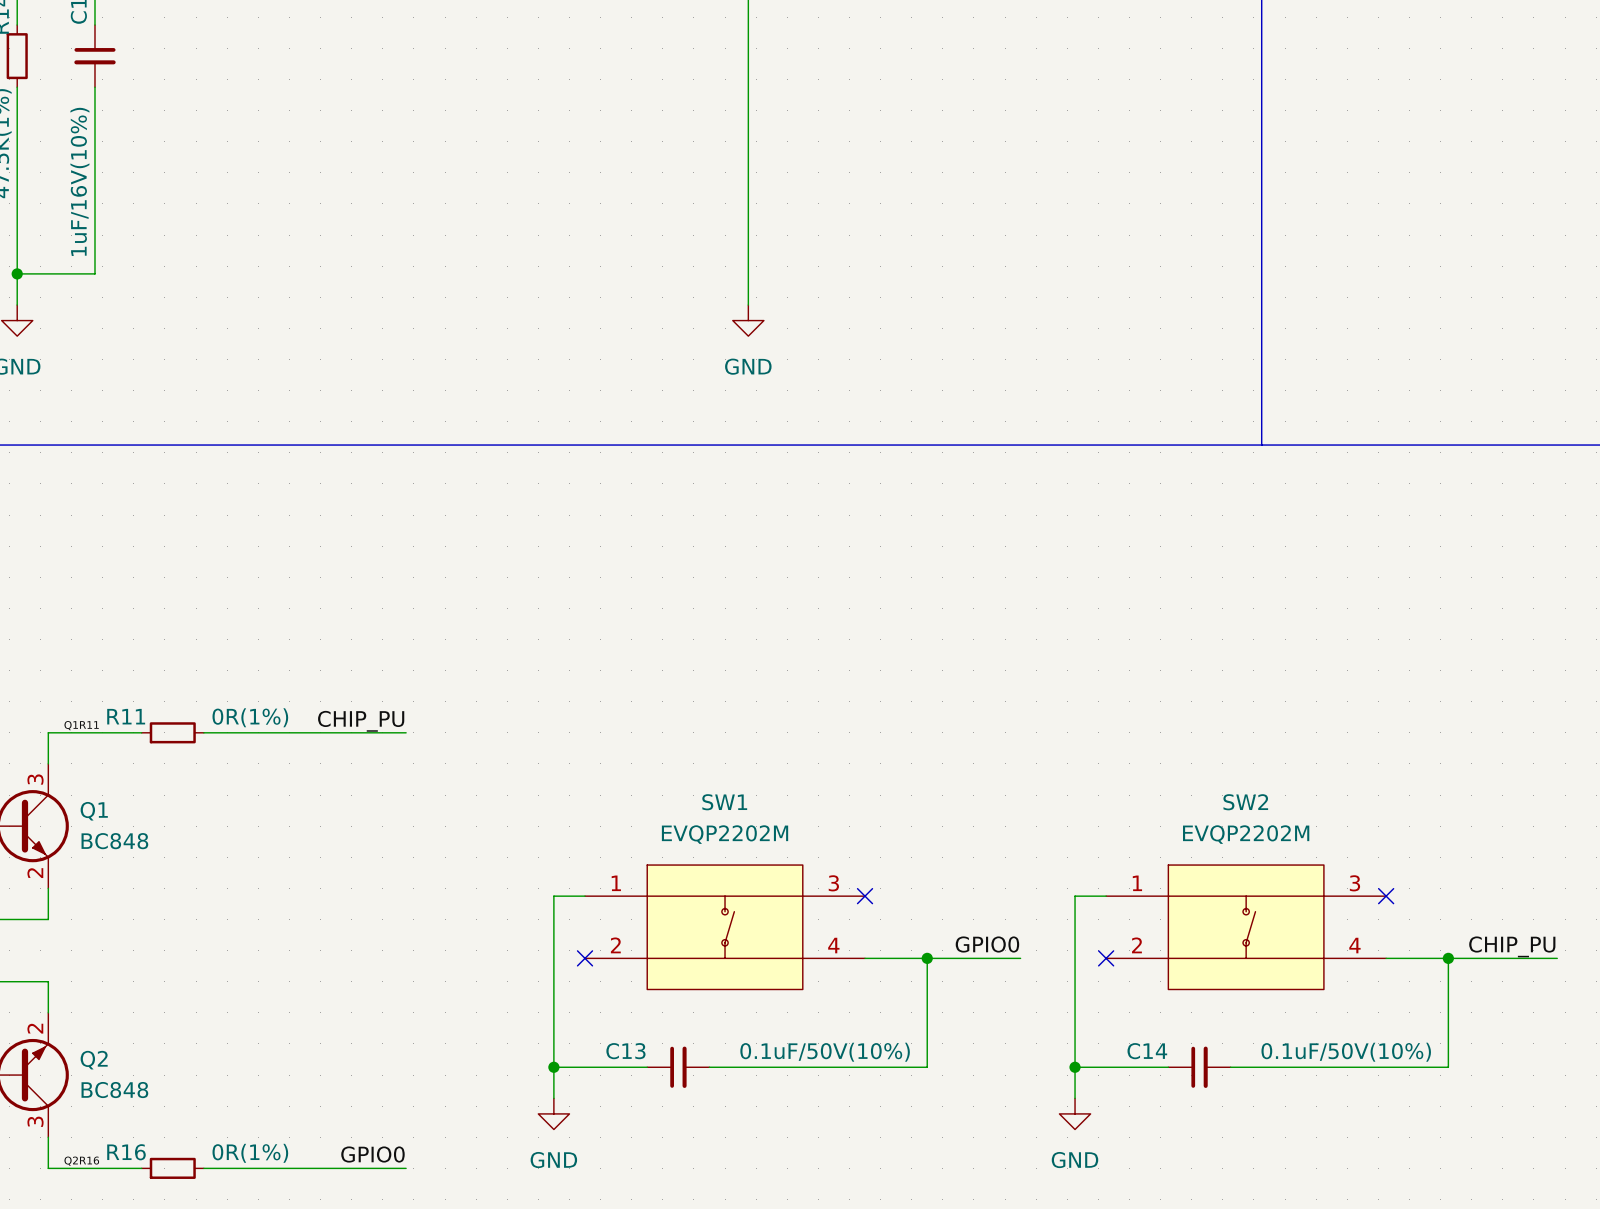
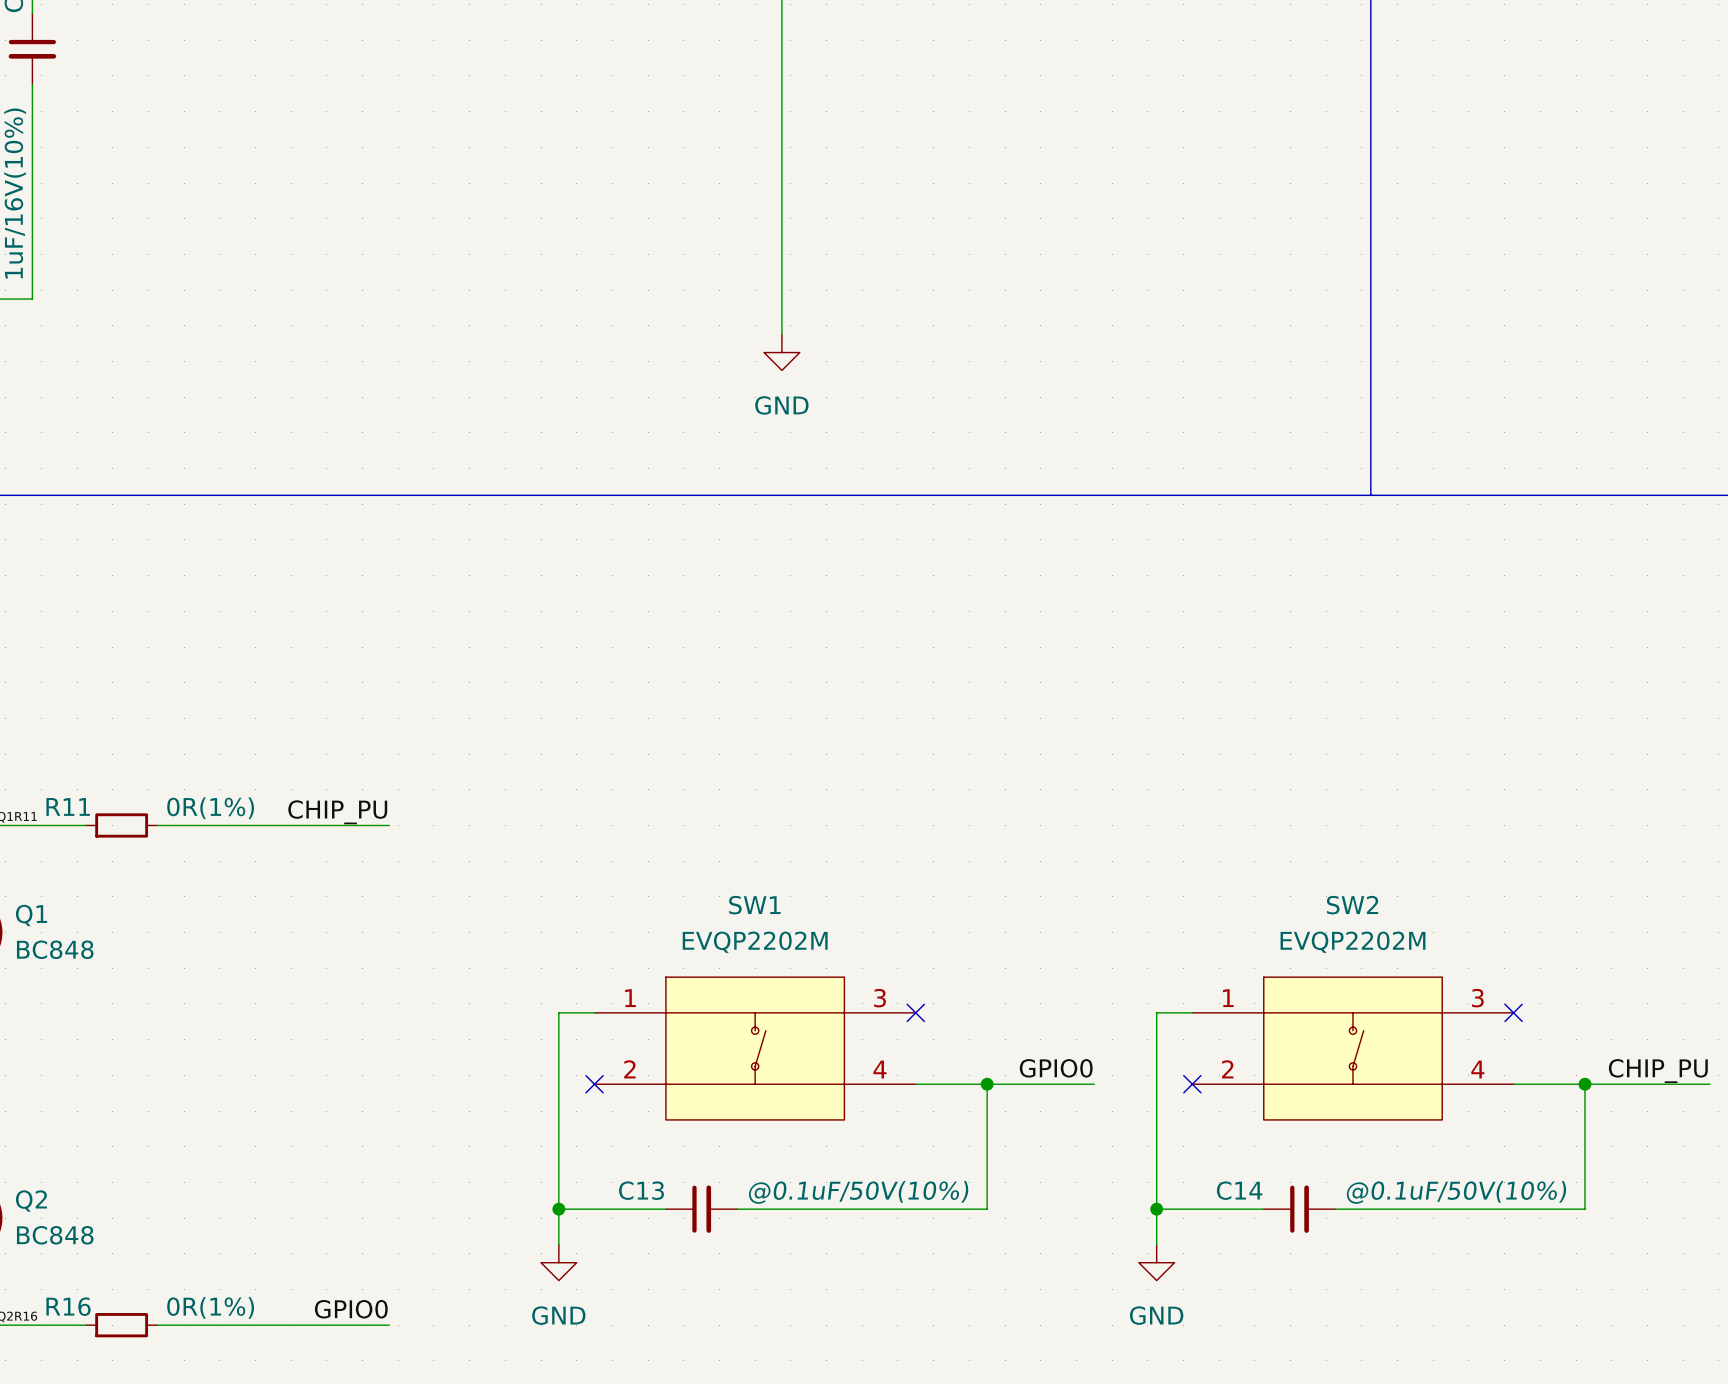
C13 value: 0.1uF/50V(10%) (825, 1052) -> @0.1uF/50V(10%) (858, 1192)
C14 value: 0.1uF/50V(10%) (1346, 1052) -> @0.1uF/50V(10%) (1456, 1192)

